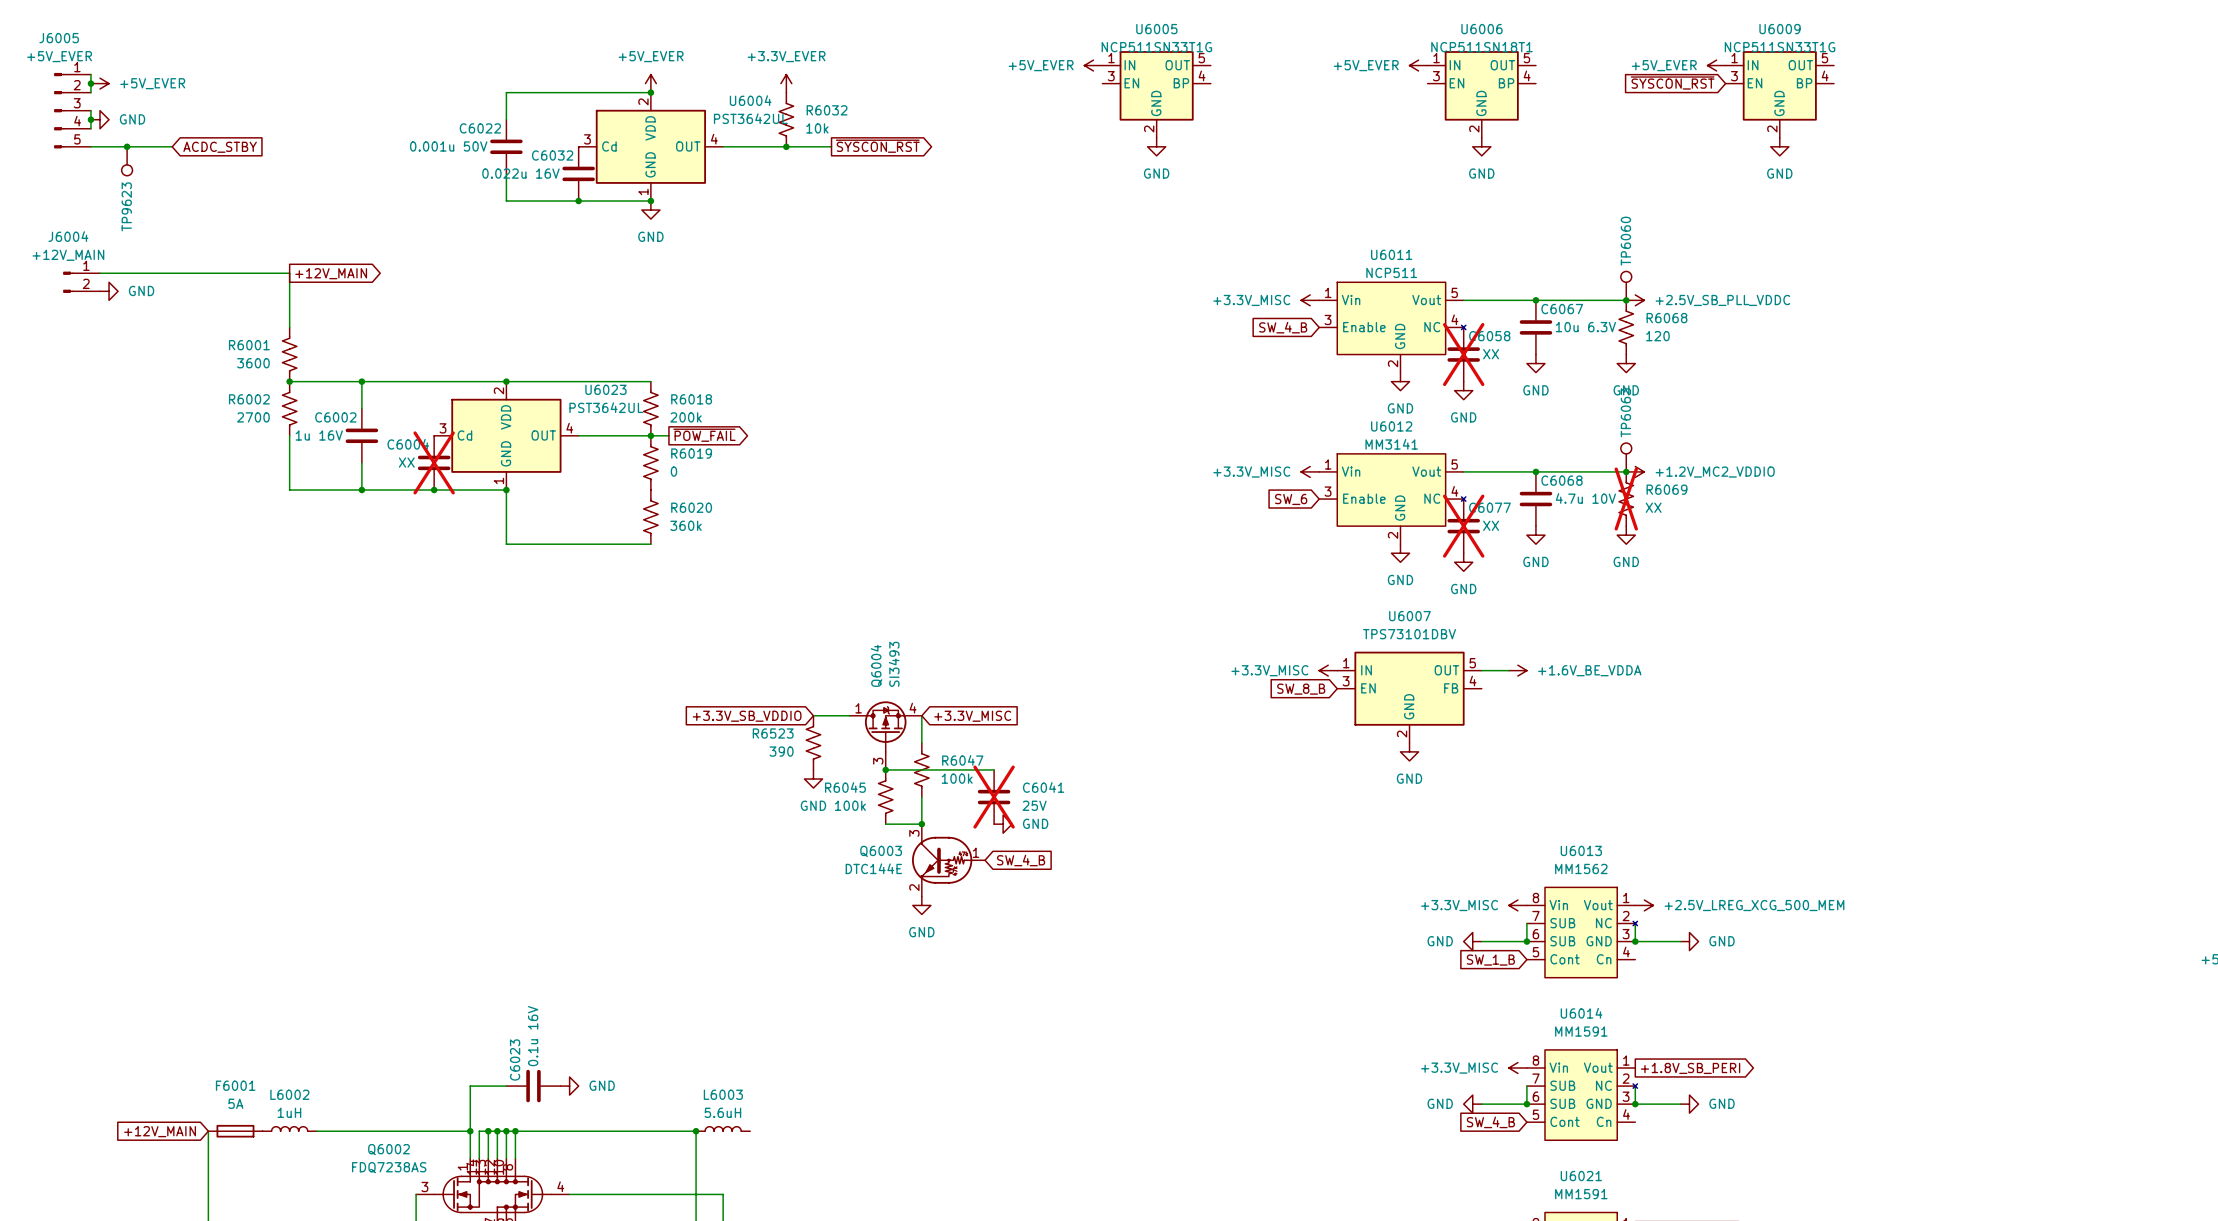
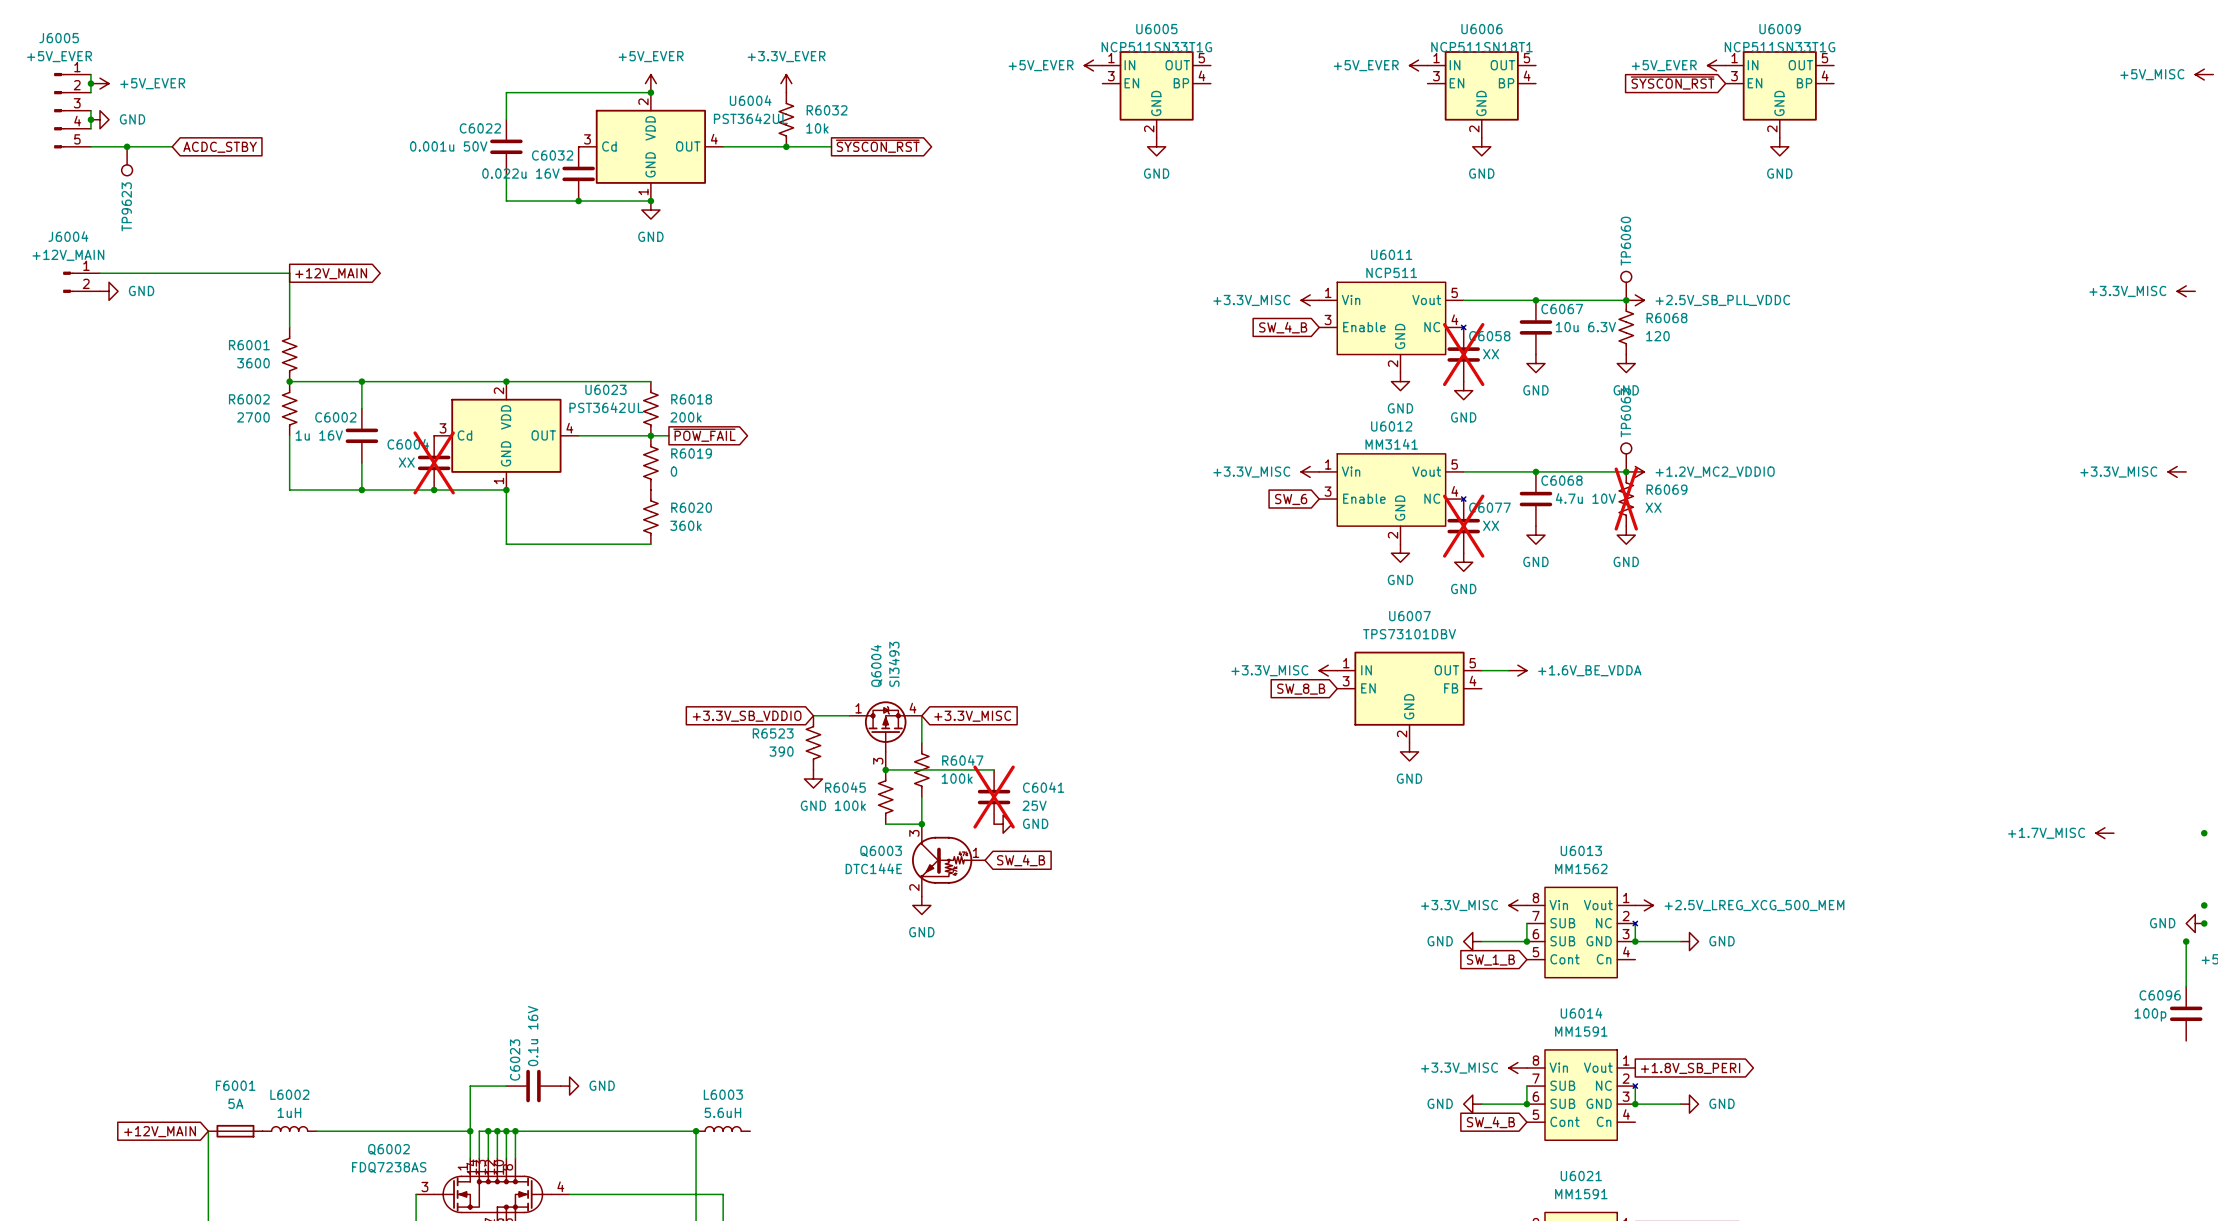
power symbol: none -> +5V_MISC (2204, 74)
power symbol: none -> +3.3V_MISC (2186, 291)
power symbol: none -> +3.3V_MISC (2177, 471)
power symbol: none -> +1.7V_MISC (2104, 833)
junction: none -> (2204, 833)
junction: none -> (2204, 905)
power symbol: none -> GND (2195, 923)
junction: none -> (2204, 923)
wire: none -> (2186, 941) (2186, 986)
junction: none -> (2186, 941)
C6096: none -> 100p (2186, 1013)

